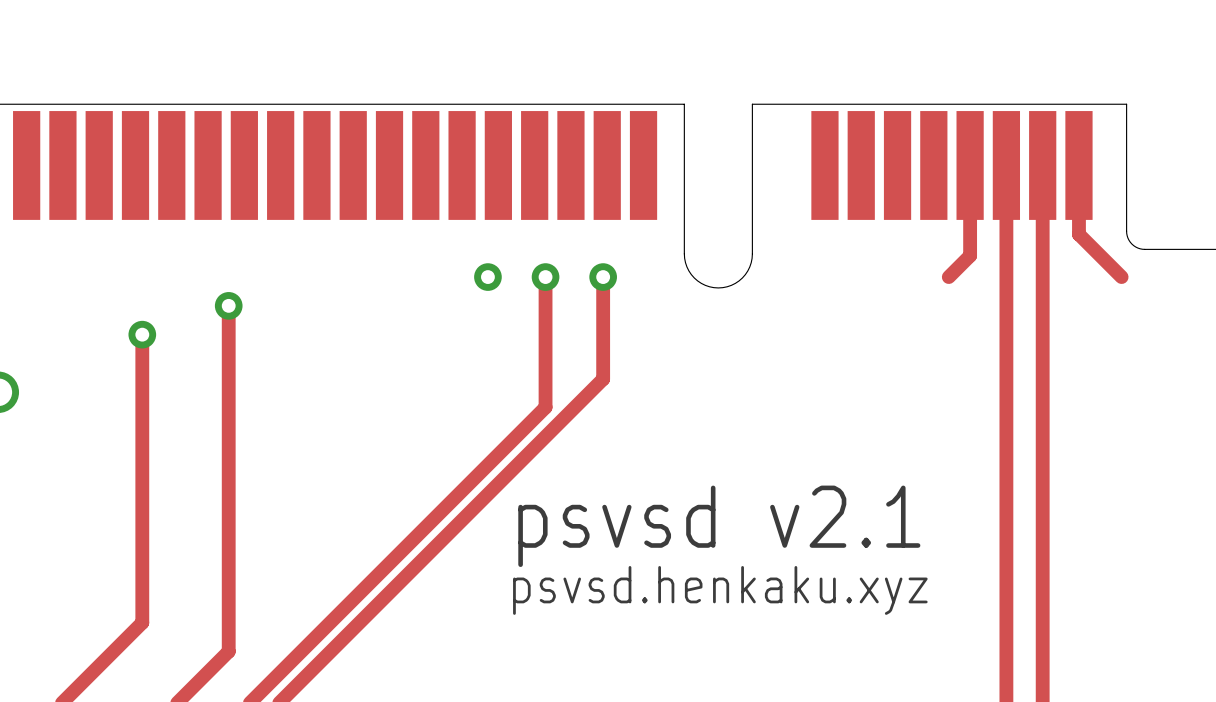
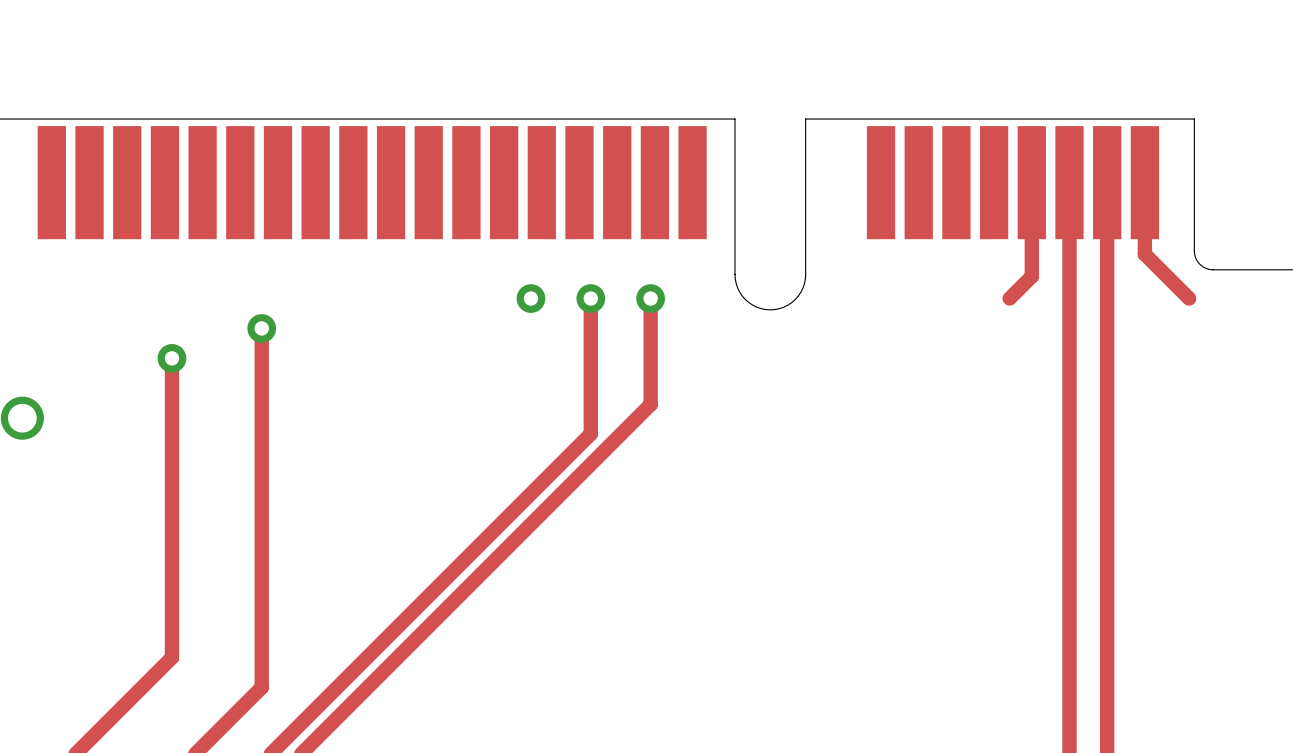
text: psvsd v2.1 (719, 526) -> none
text: psvsd.henkaku.xyz (720, 590) -> none

